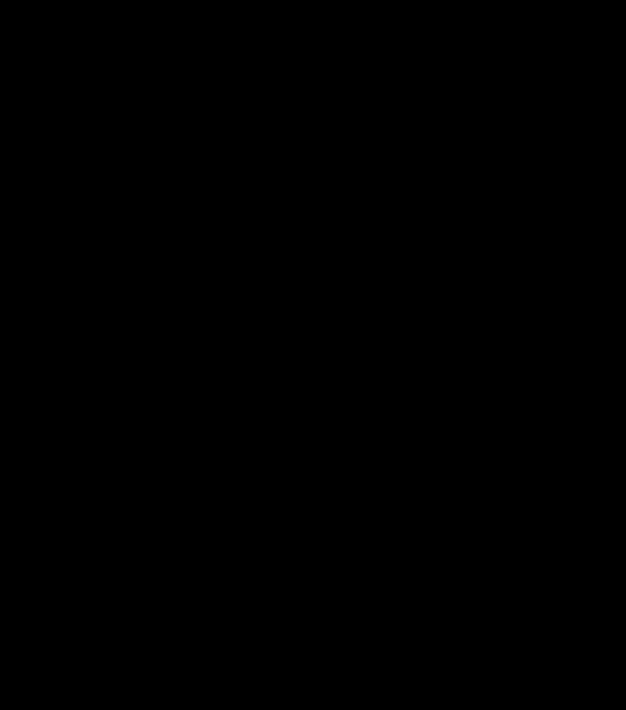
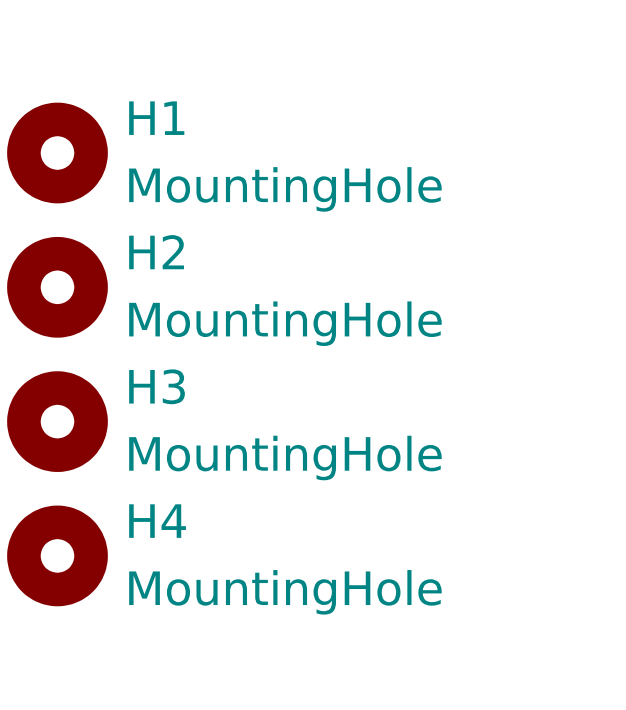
H1: none -> MountingHole (57, 153)
H2: none -> MountingHole (57, 287)
H3: none -> MountingHole (57, 421)
H4: none -> MountingHole (57, 555)

